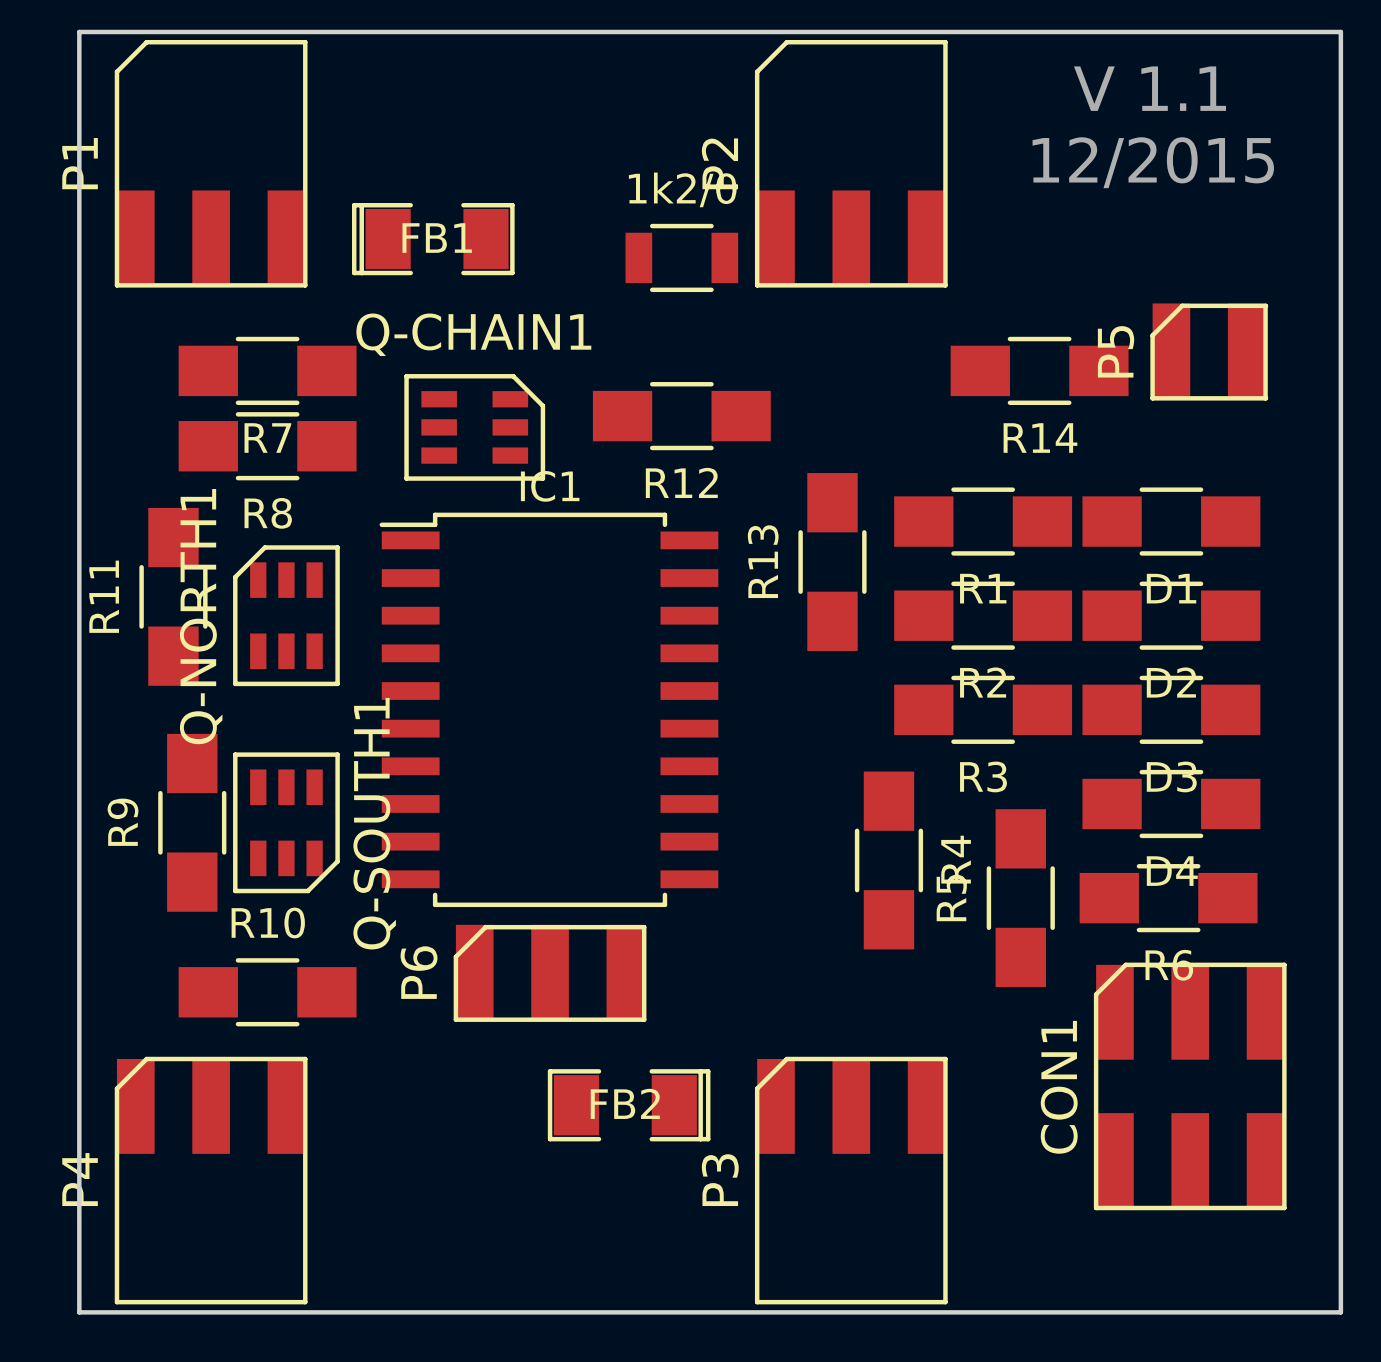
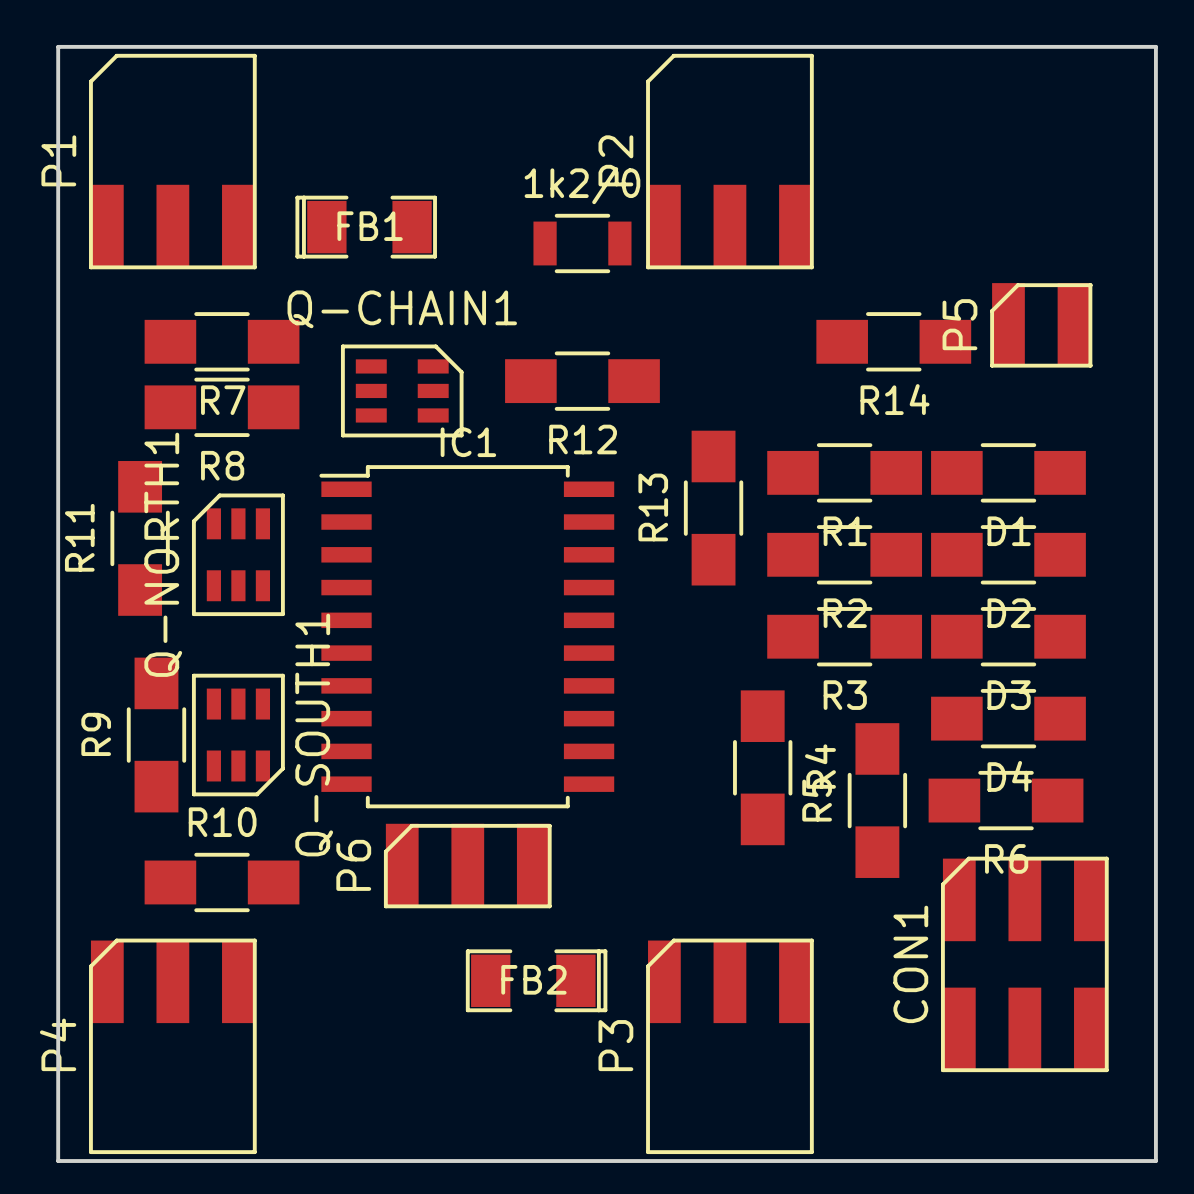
text: V 1.1 (1150, 88) -> none
text: 12/2015 (1153, 162) -> none

